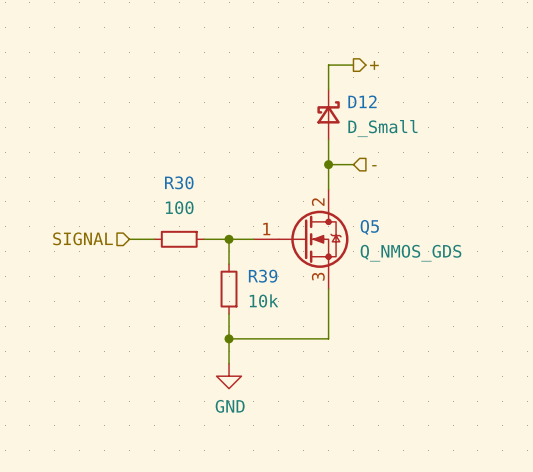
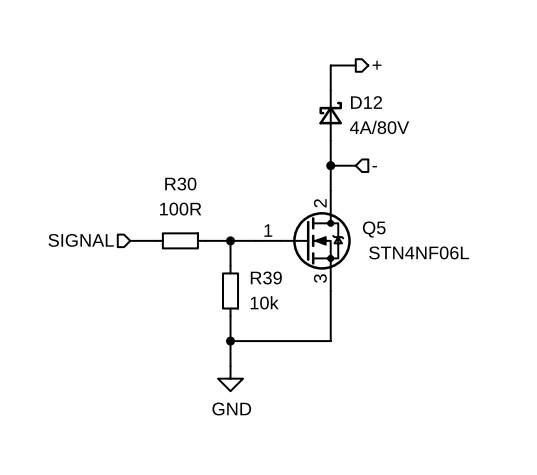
D12 value: D_Small (382, 128) -> 4A/80V (379, 127)
R30 value: 100 (179, 207) -> 100R (180, 209)
Q5 value: Q_NMOS_GDS (411, 253) -> STN4NF06L (419, 252)

